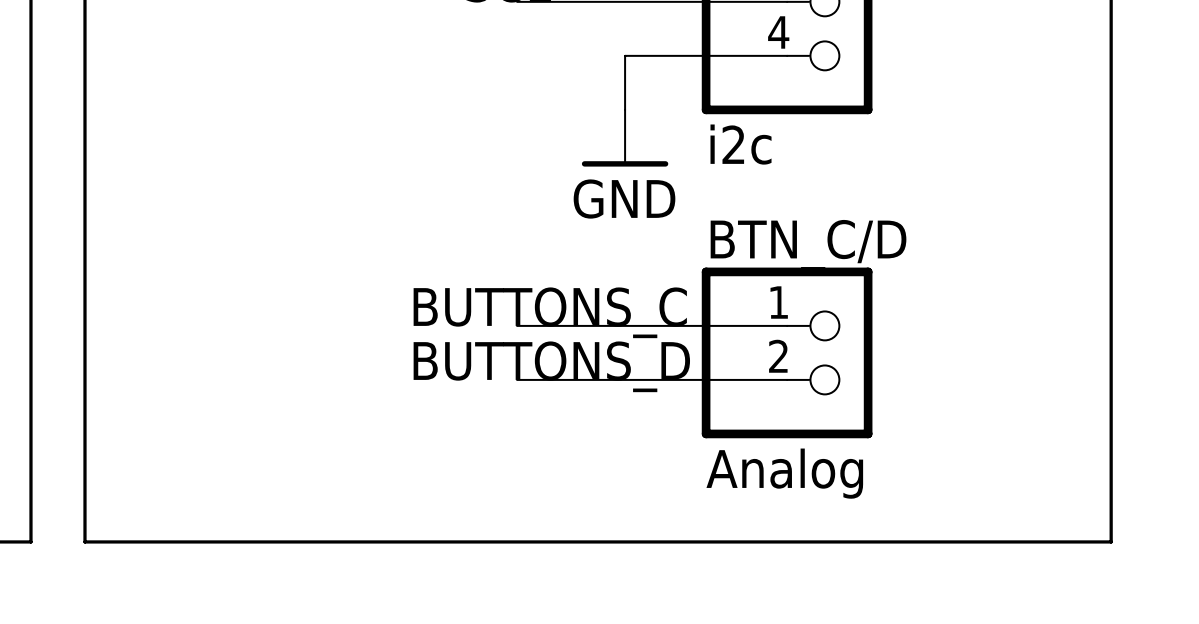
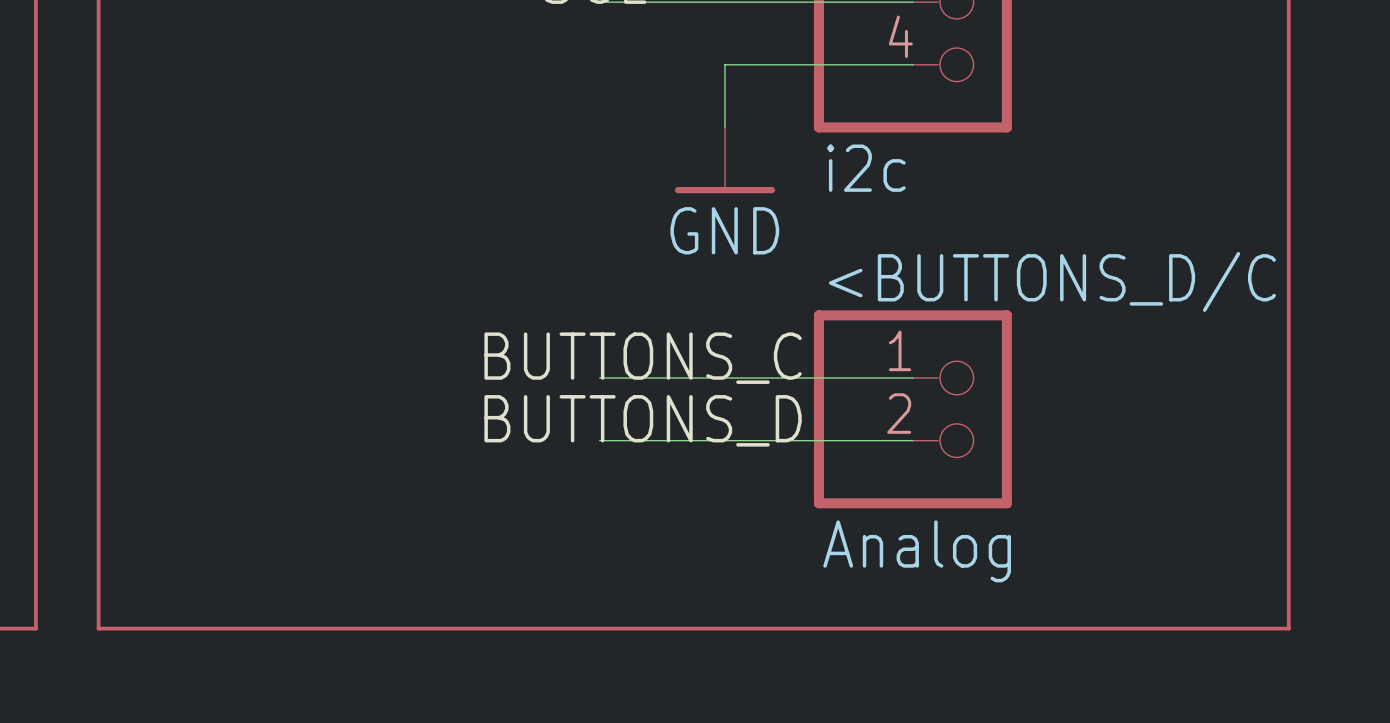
BTN_C/D name: BTN_C/D (808, 245) -> <BUTTONS_D/C (1052, 281)

